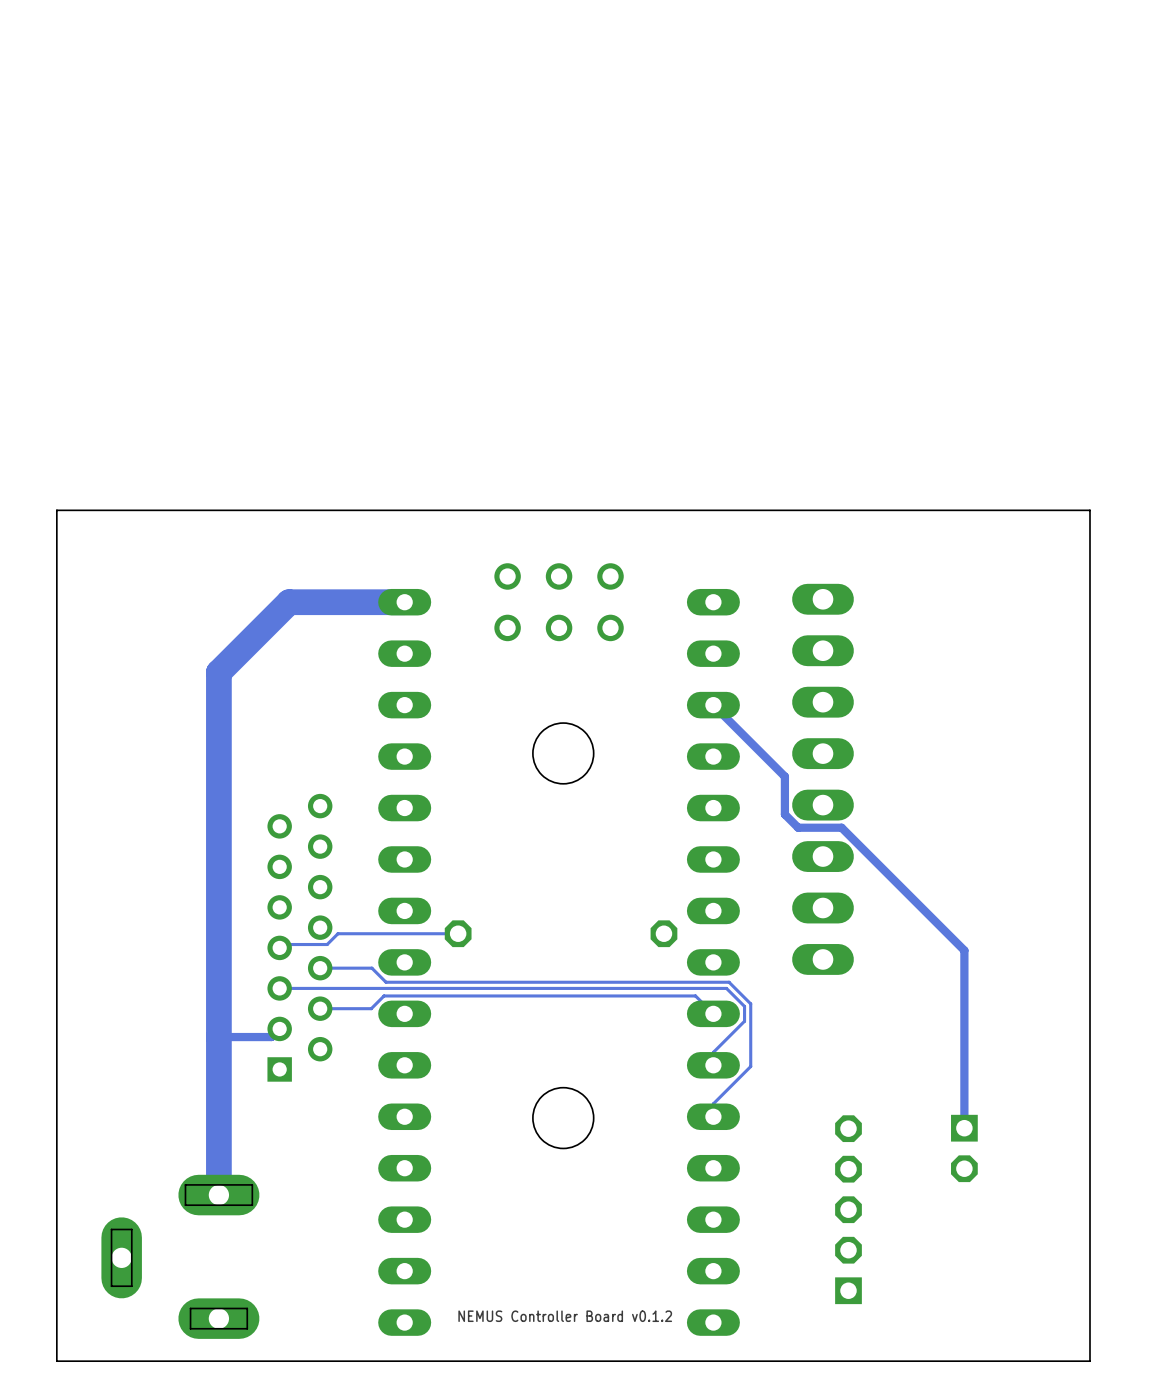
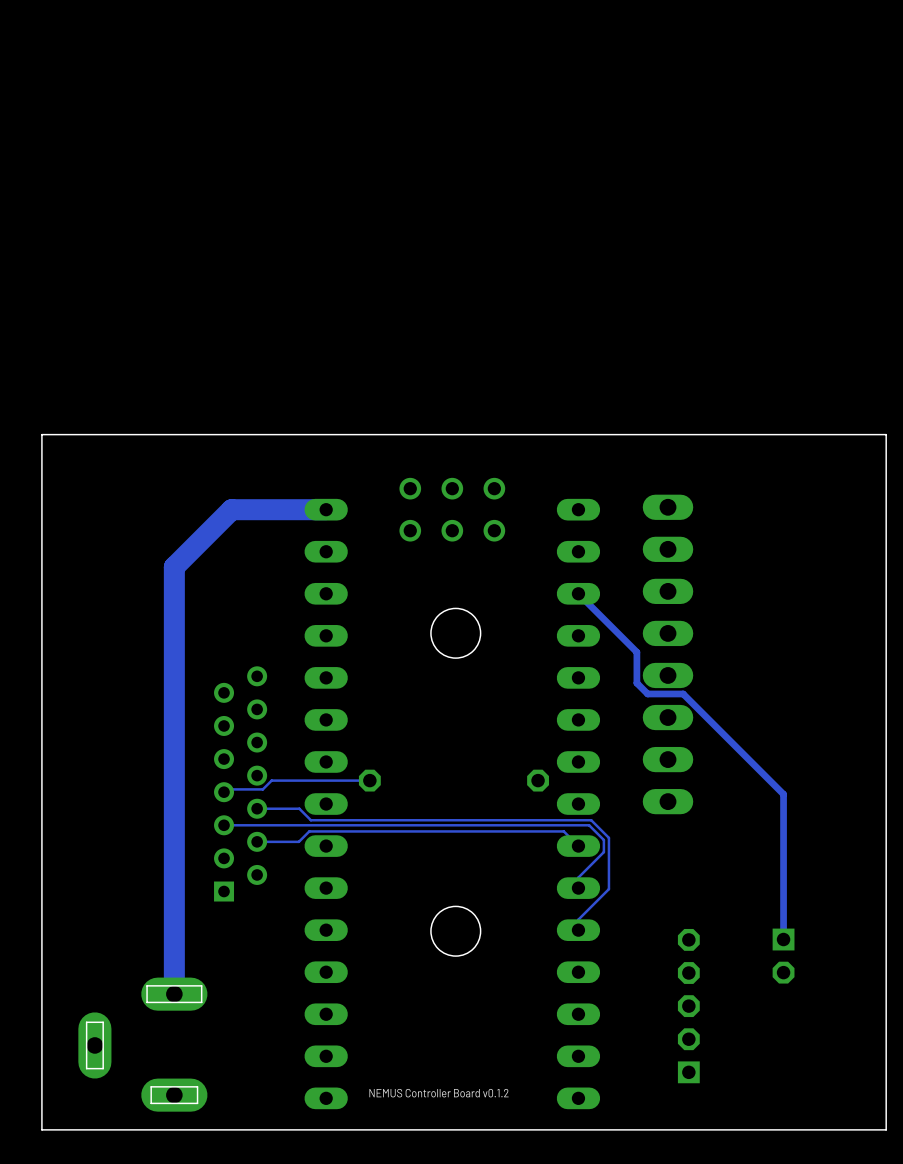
track: (279, 1028) (271, 1037) (218, 1037) -> none

